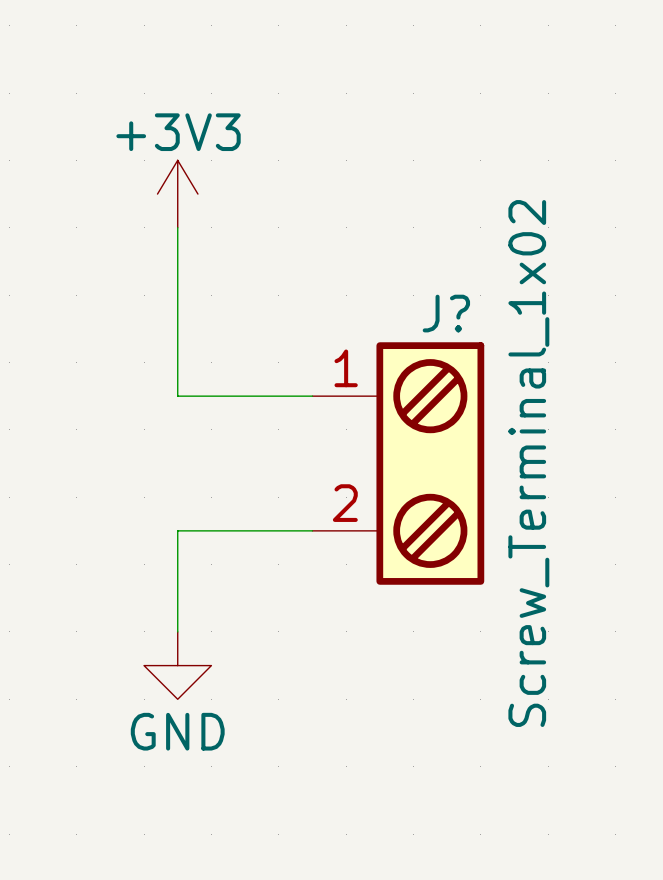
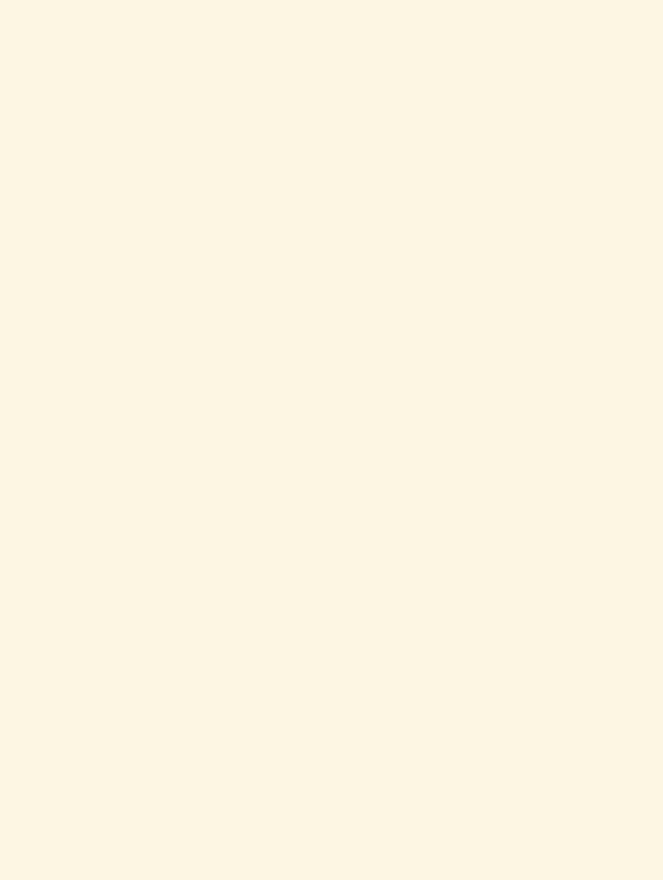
power symbol: +3V3 (177, 194) -> none
wire: (177, 227) (177, 396) (312, 396) -> none
J?: Screw_Terminal_1x02 (398, 463) -> none
wire: (312, 530) (177, 530) (177, 631) -> none
power symbol: GND (177, 665) -> none

